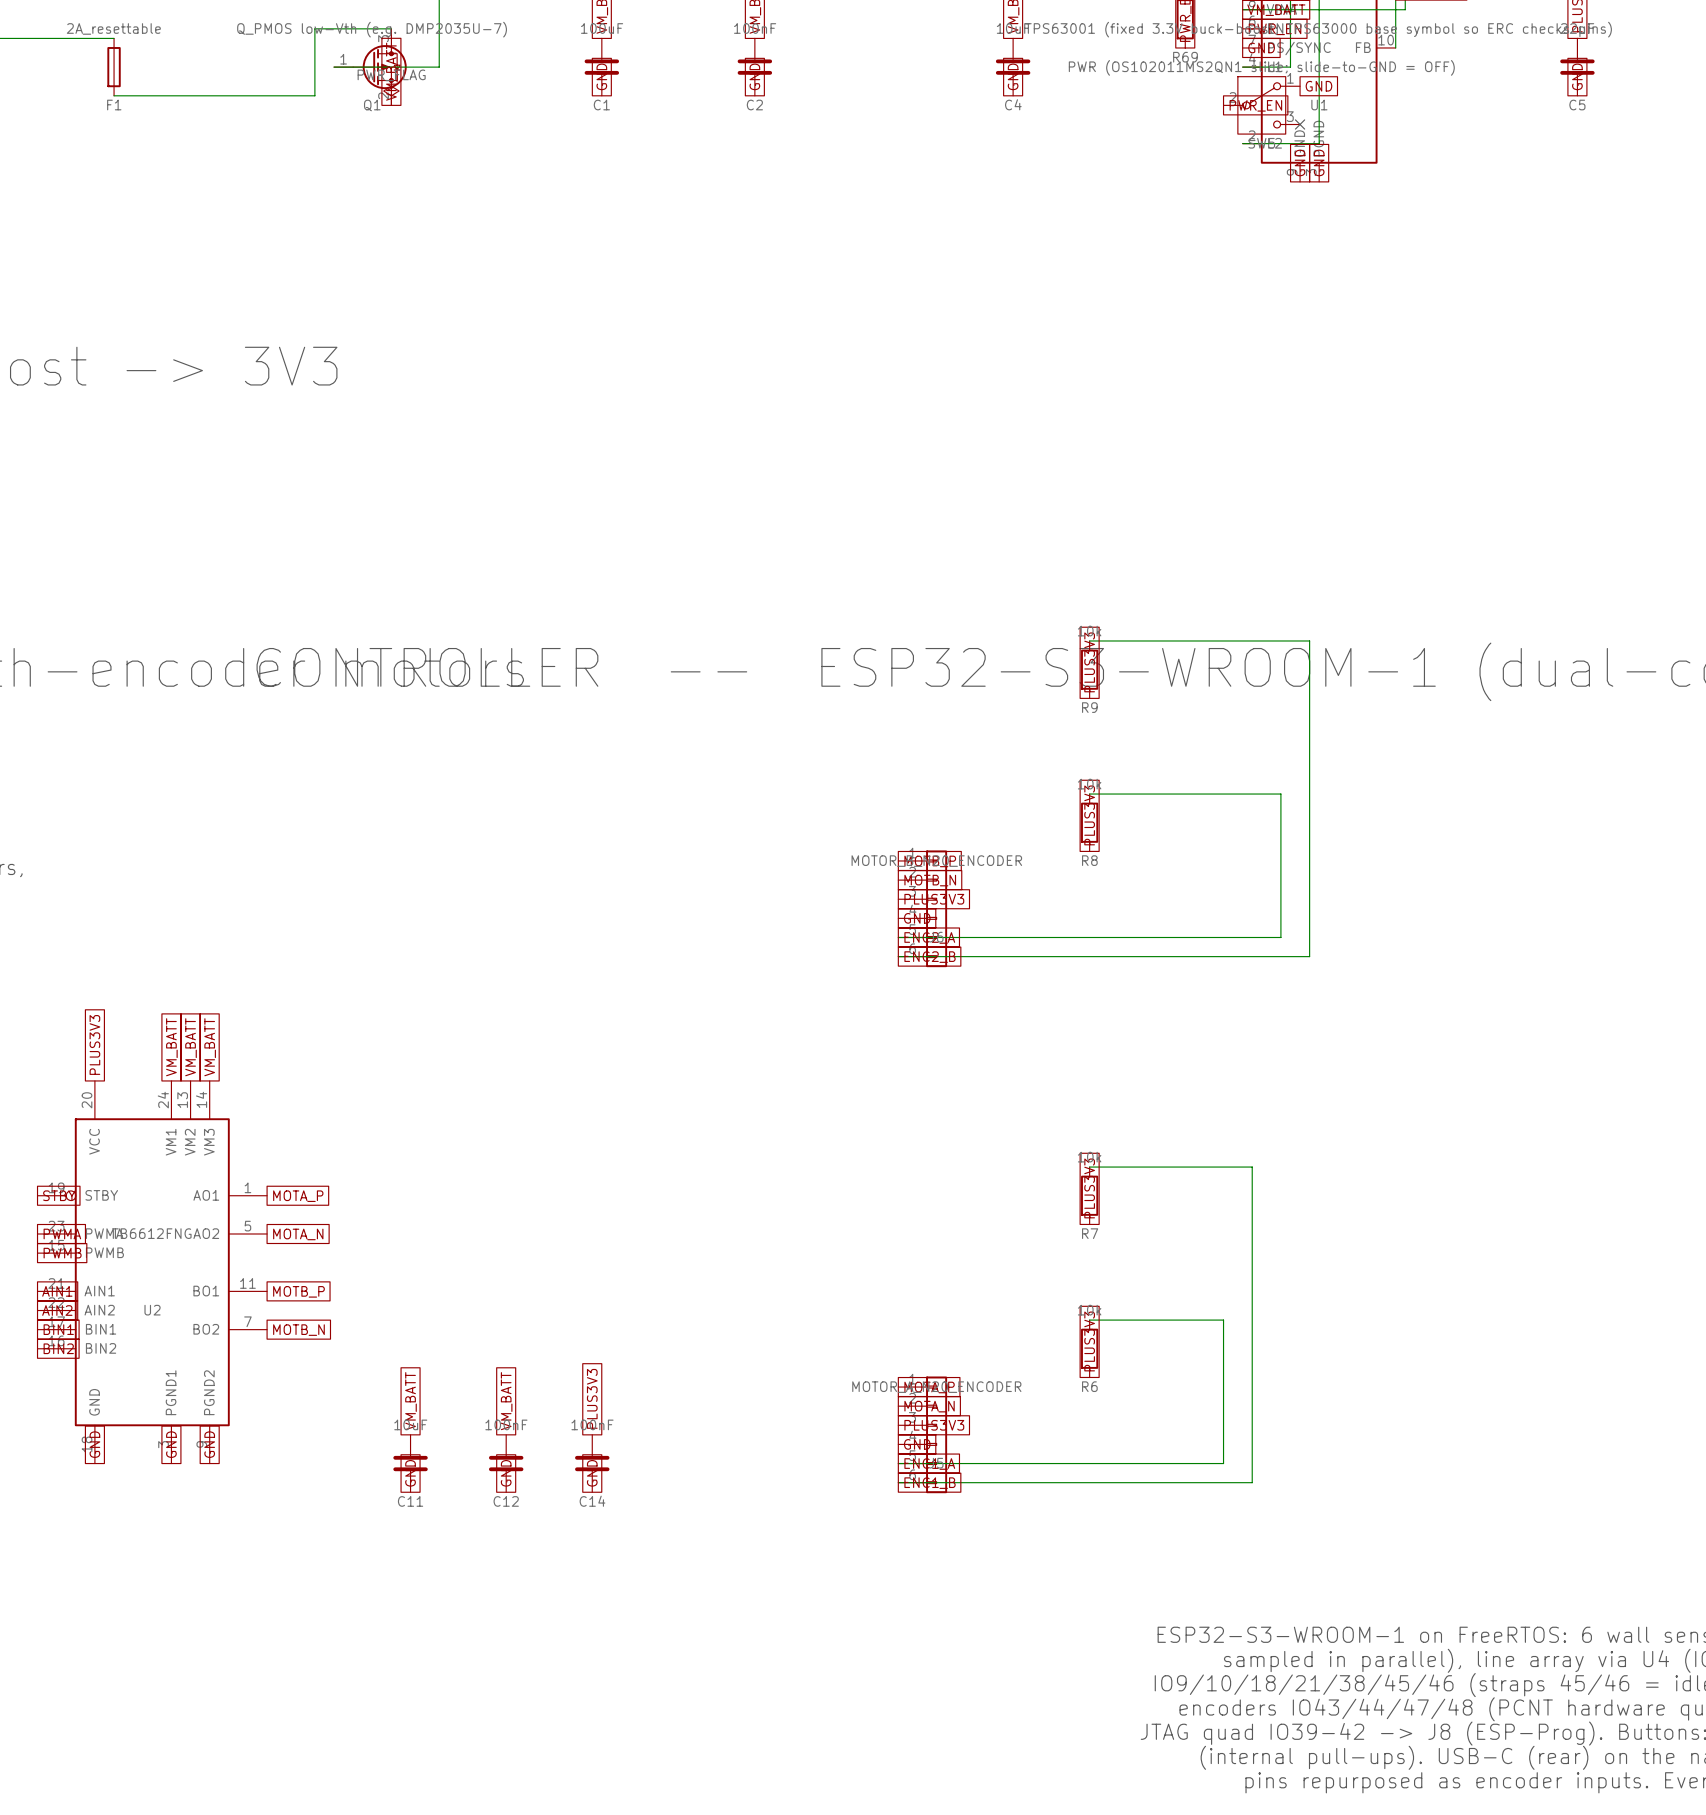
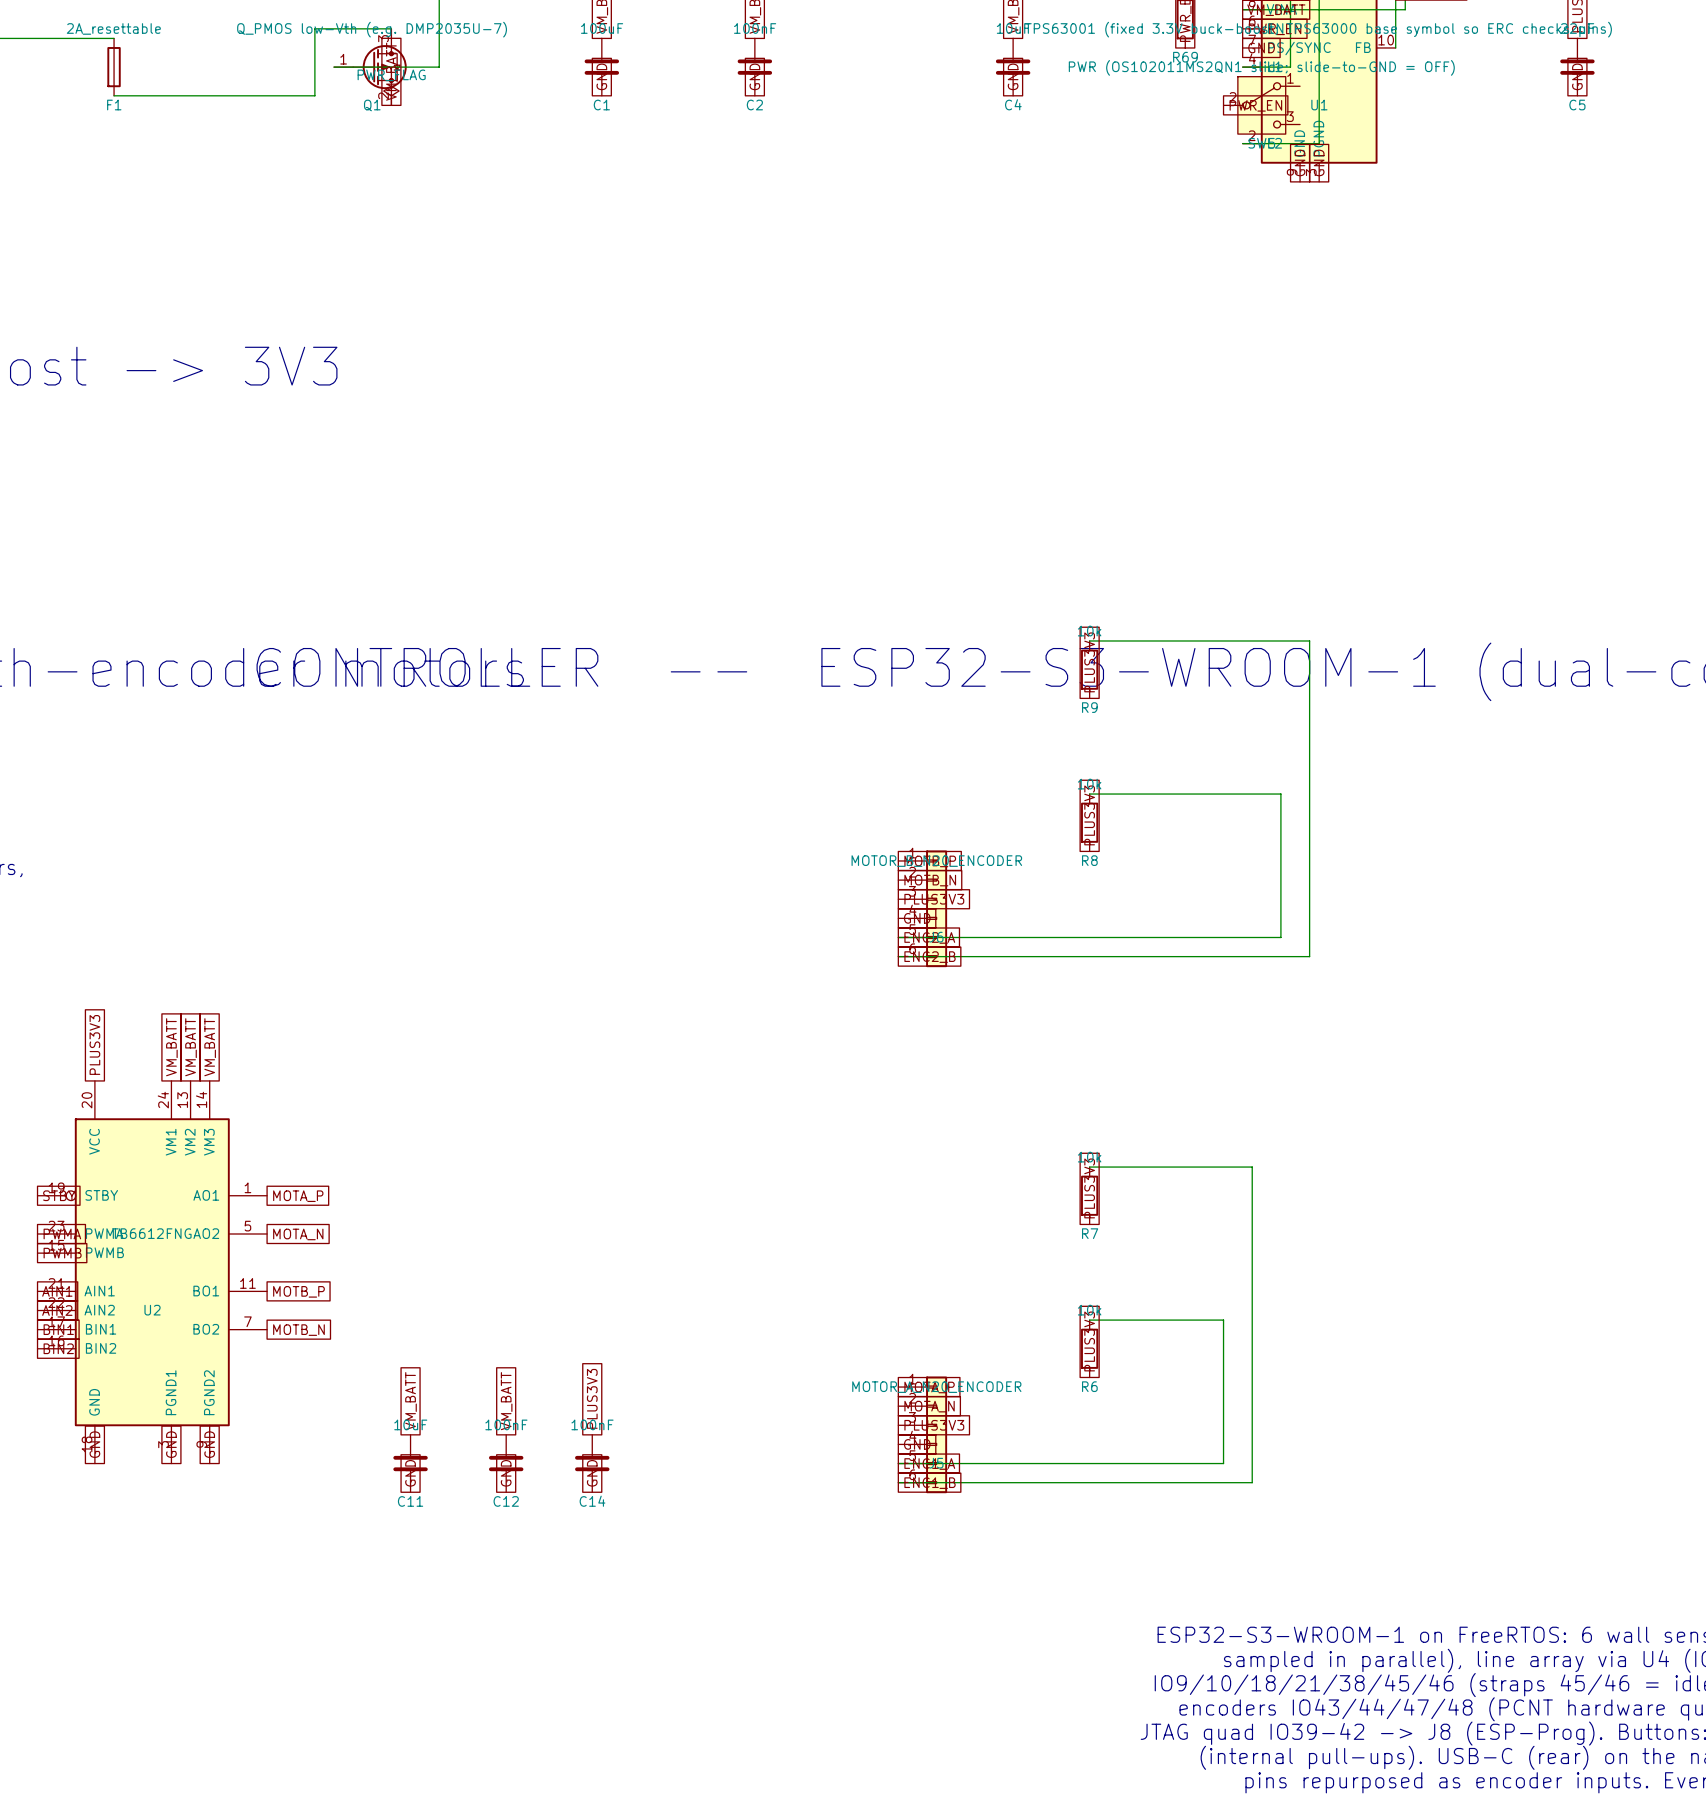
global label: GND (1318, 86) -> none
no-connect mark: (1300, 124) -> none

